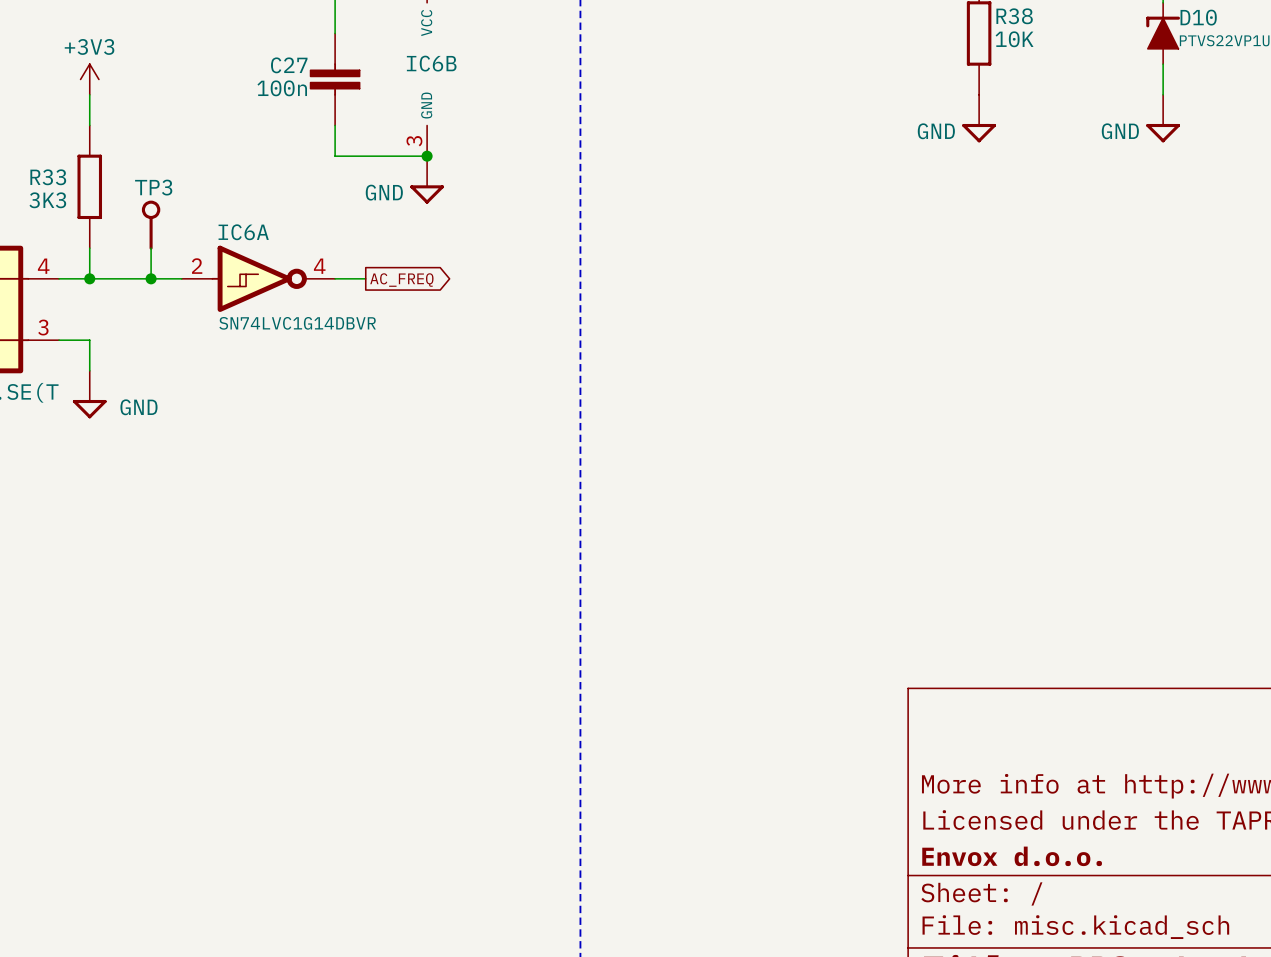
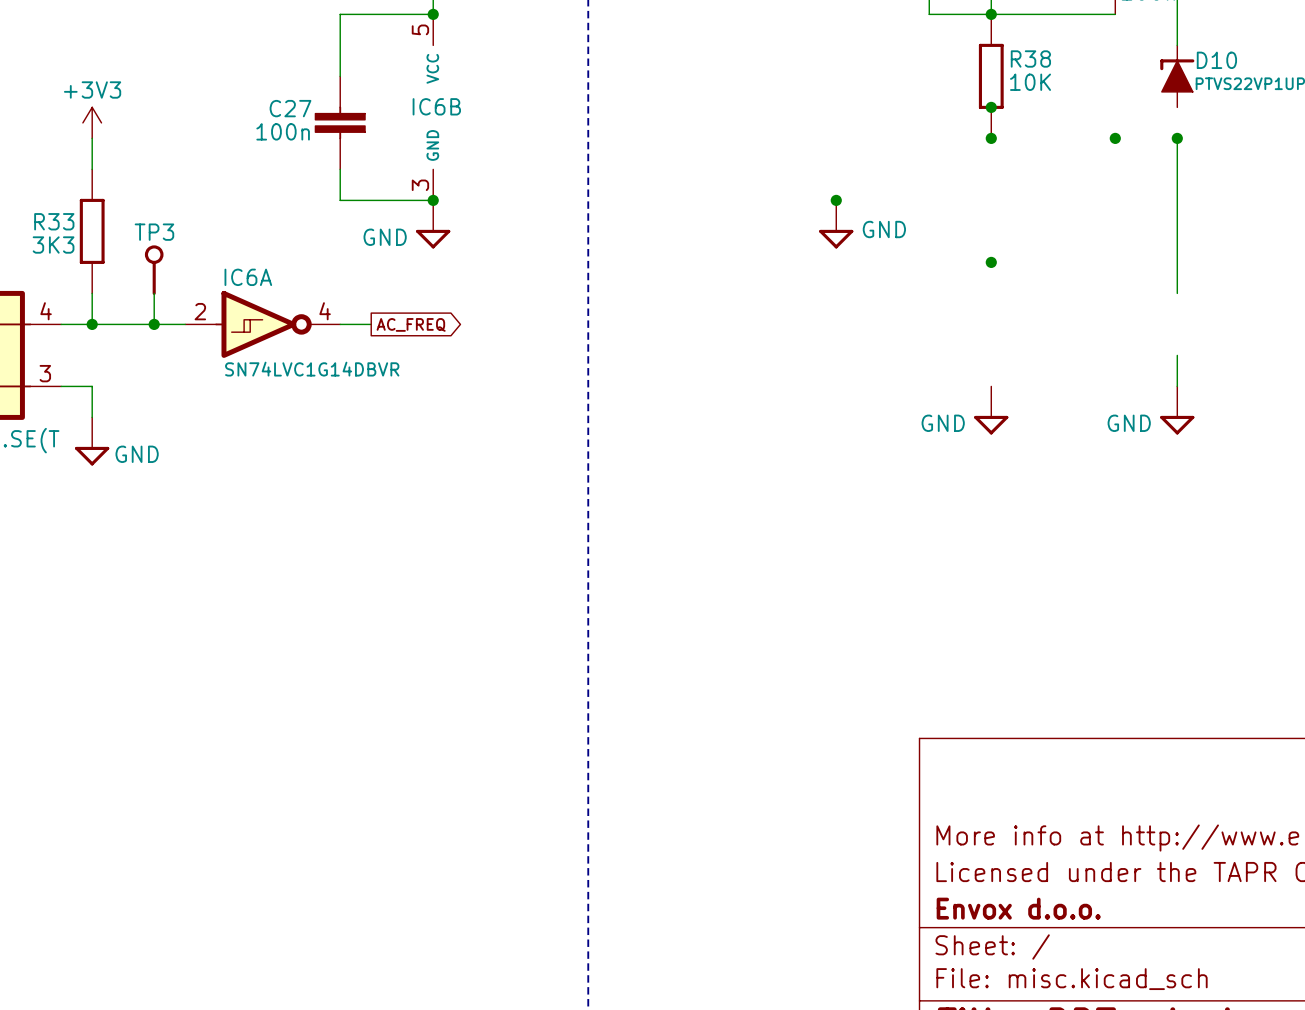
junction: none -> (991, 107)
wire: (1163, 64) (1163, 94) -> (1177, 293) (1177, 138)
junction: none -> (991, 138)
junction: none -> (1115, 138)
junction: none -> (1177, 138)
power symbol: GND (979, 118) -> none
power symbol: GND (1163, 118) -> none
junction: none -> (836, 200)
power symbol: none -> GND (836, 224)
junction: none -> (991, 262)
wire: none -> (1177, 355) (1177, 386)
power symbol: none -> GND (991, 410)
power symbol: none -> GND (1177, 410)

